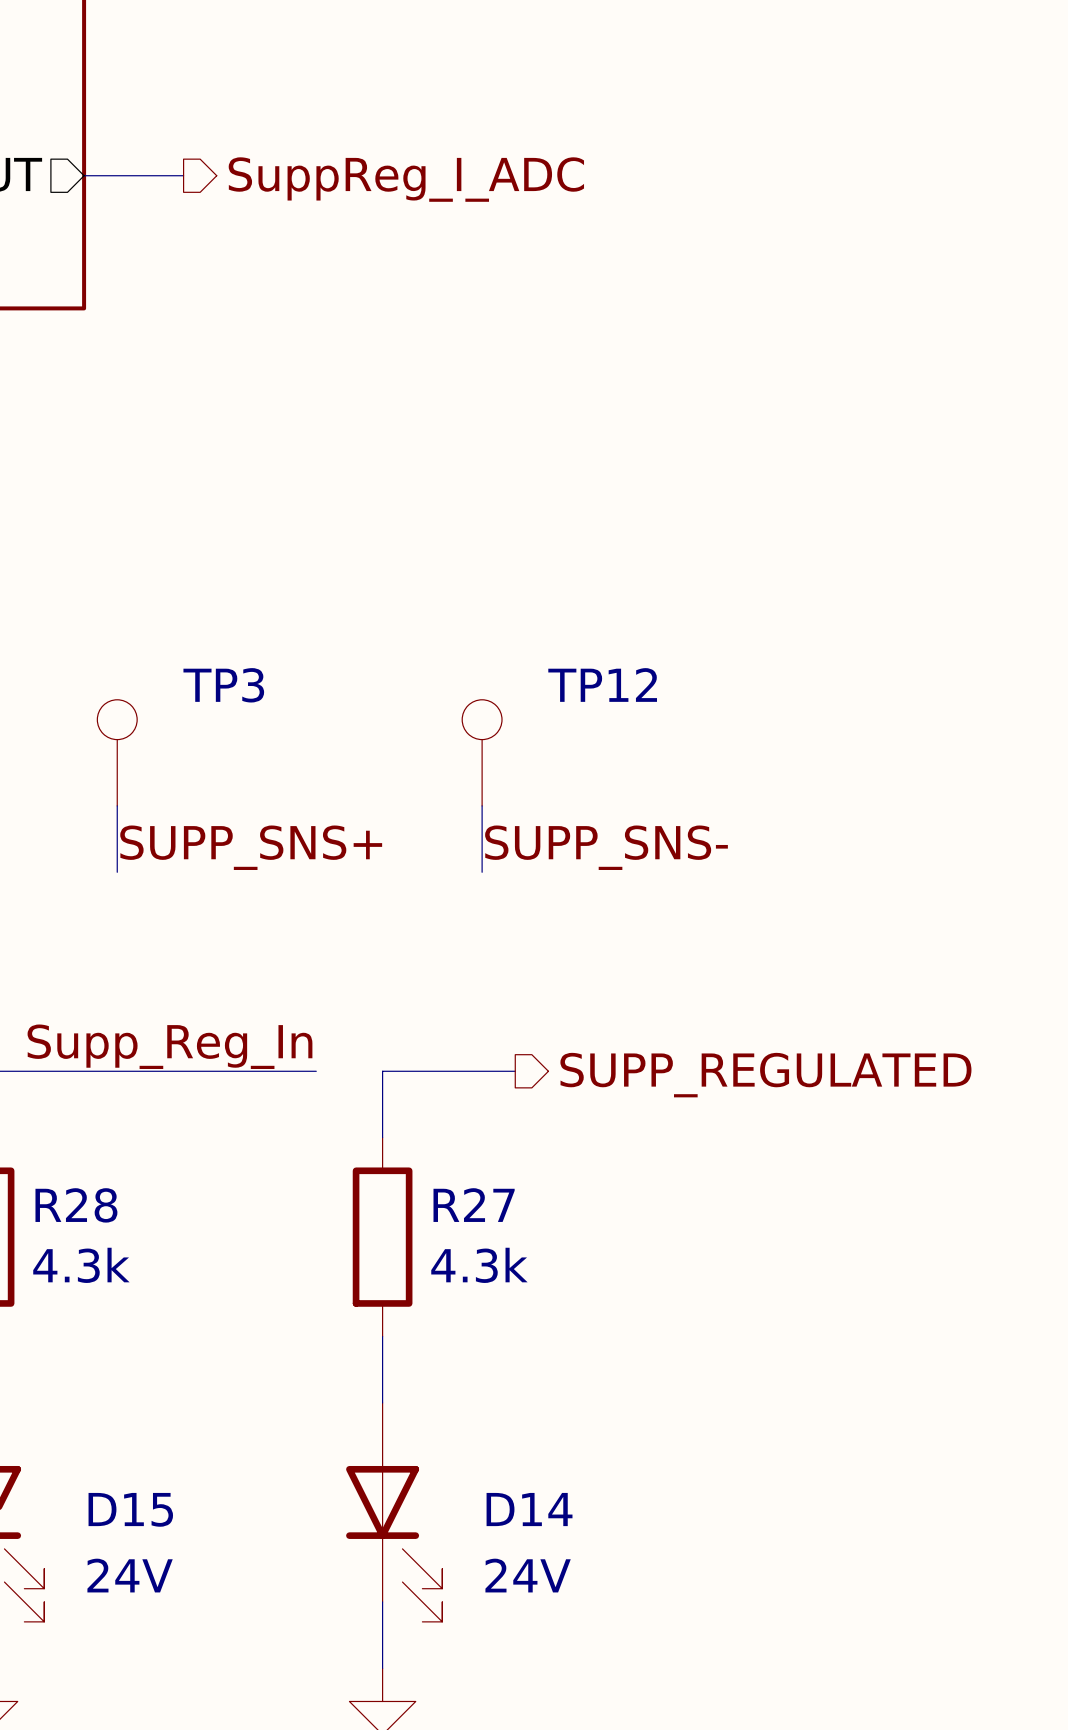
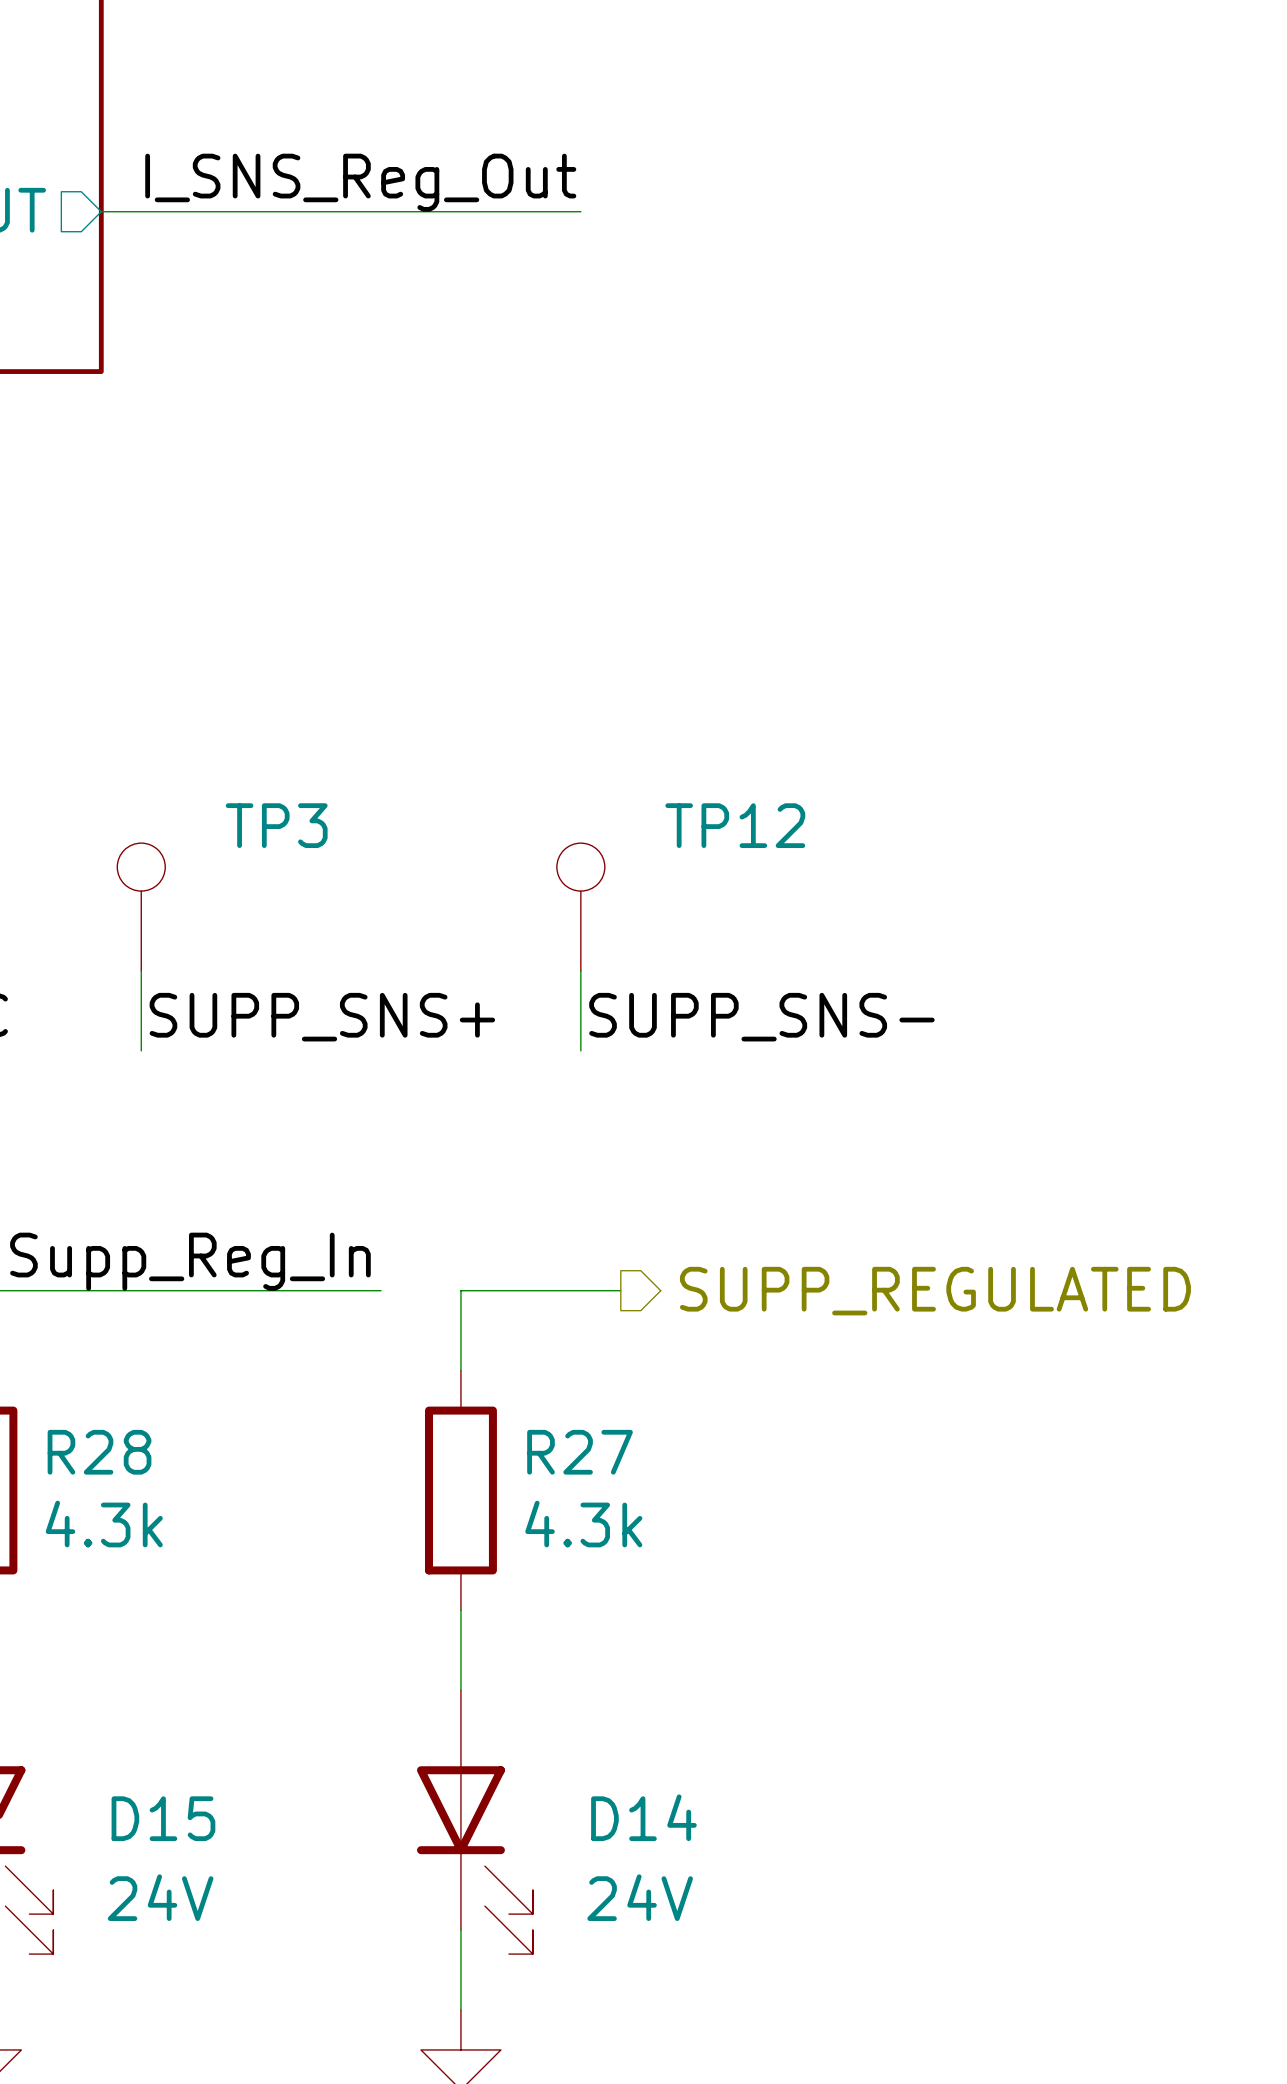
label: none -> I_SNS_Reg_Out (360, 182)
wire: none -> (221, 211) (580, 211)
hierarchical label: SuppReg_I_ADC (406, 179) -> none

